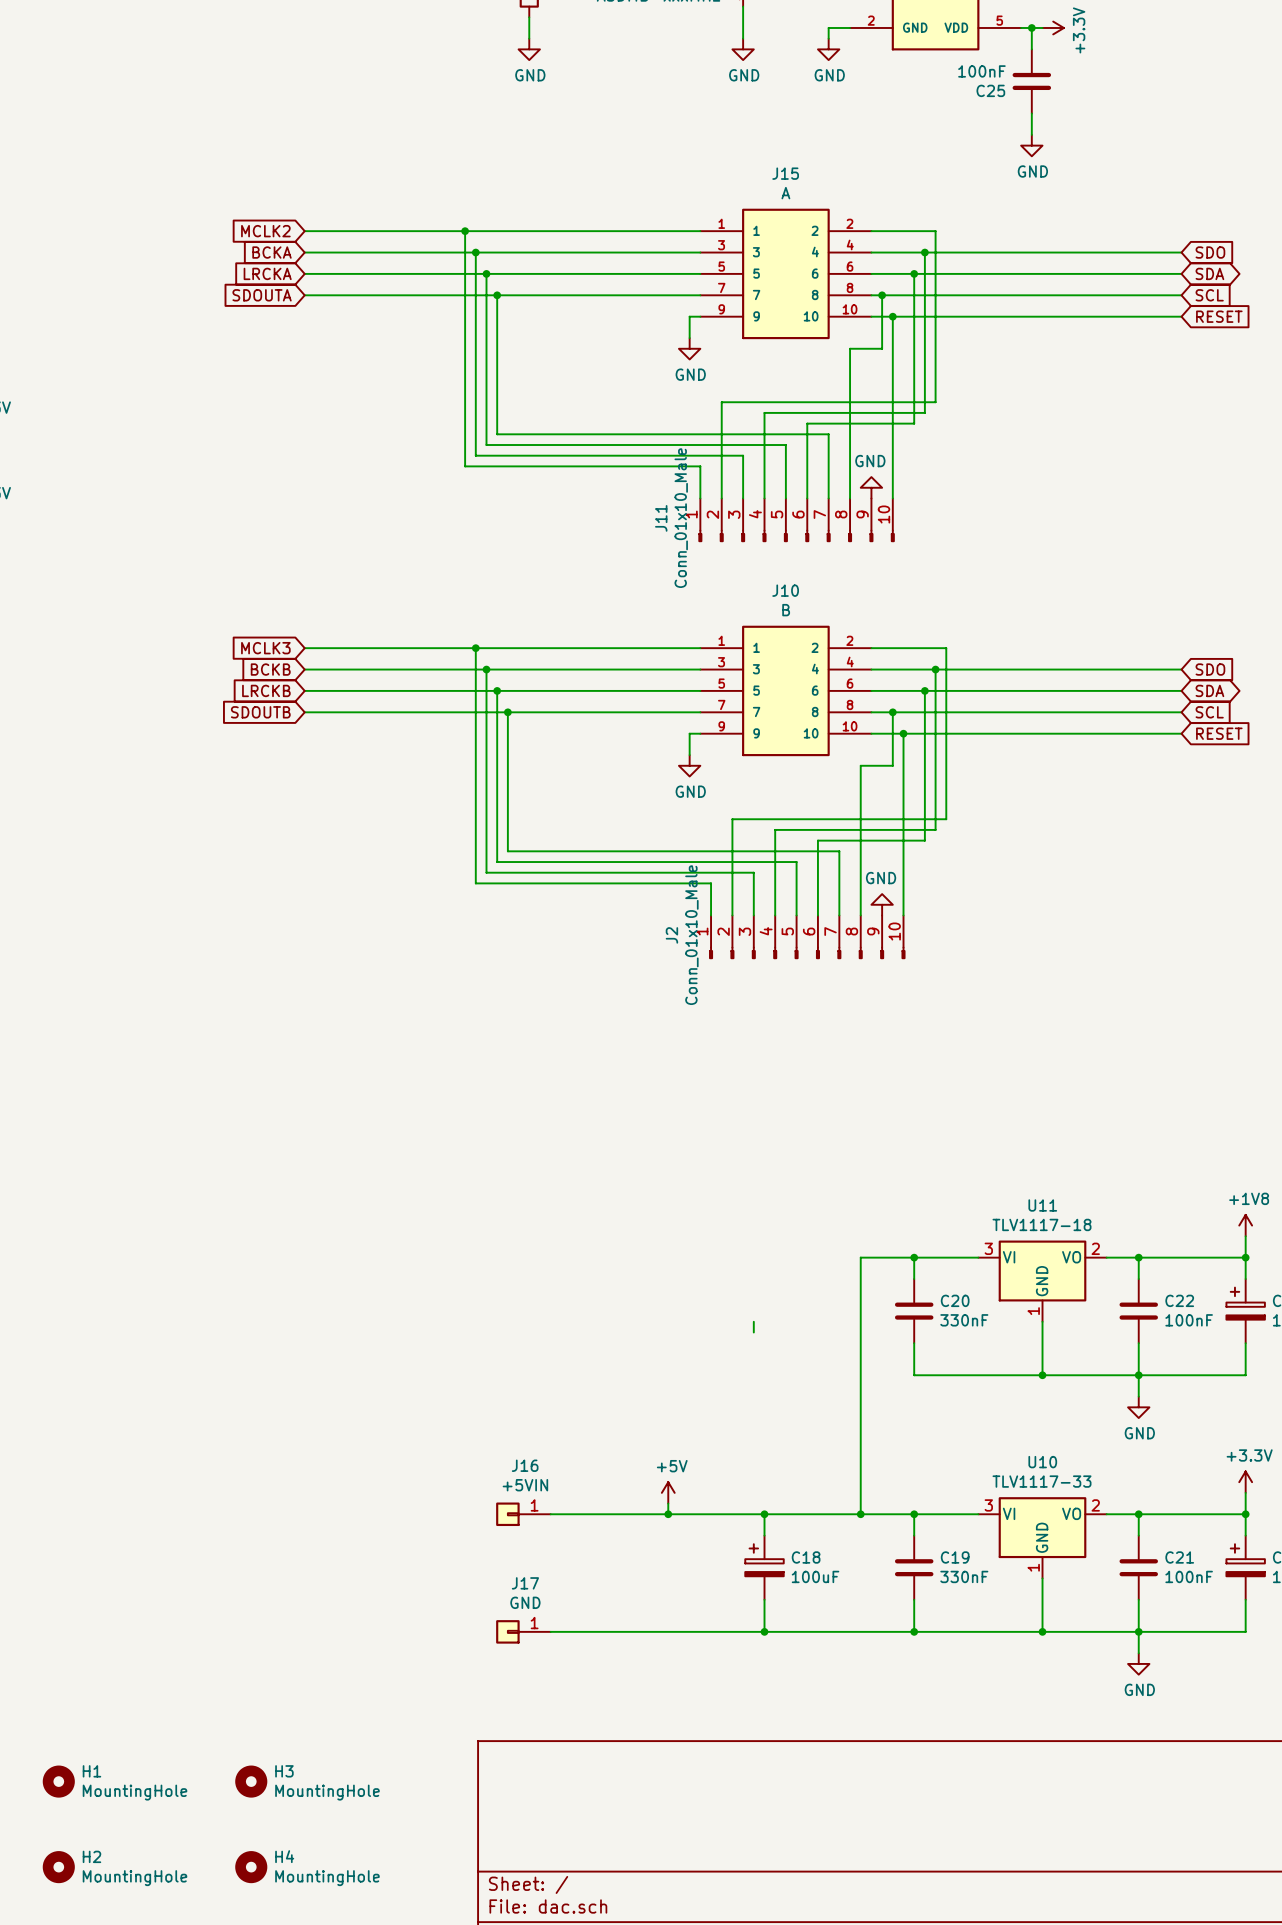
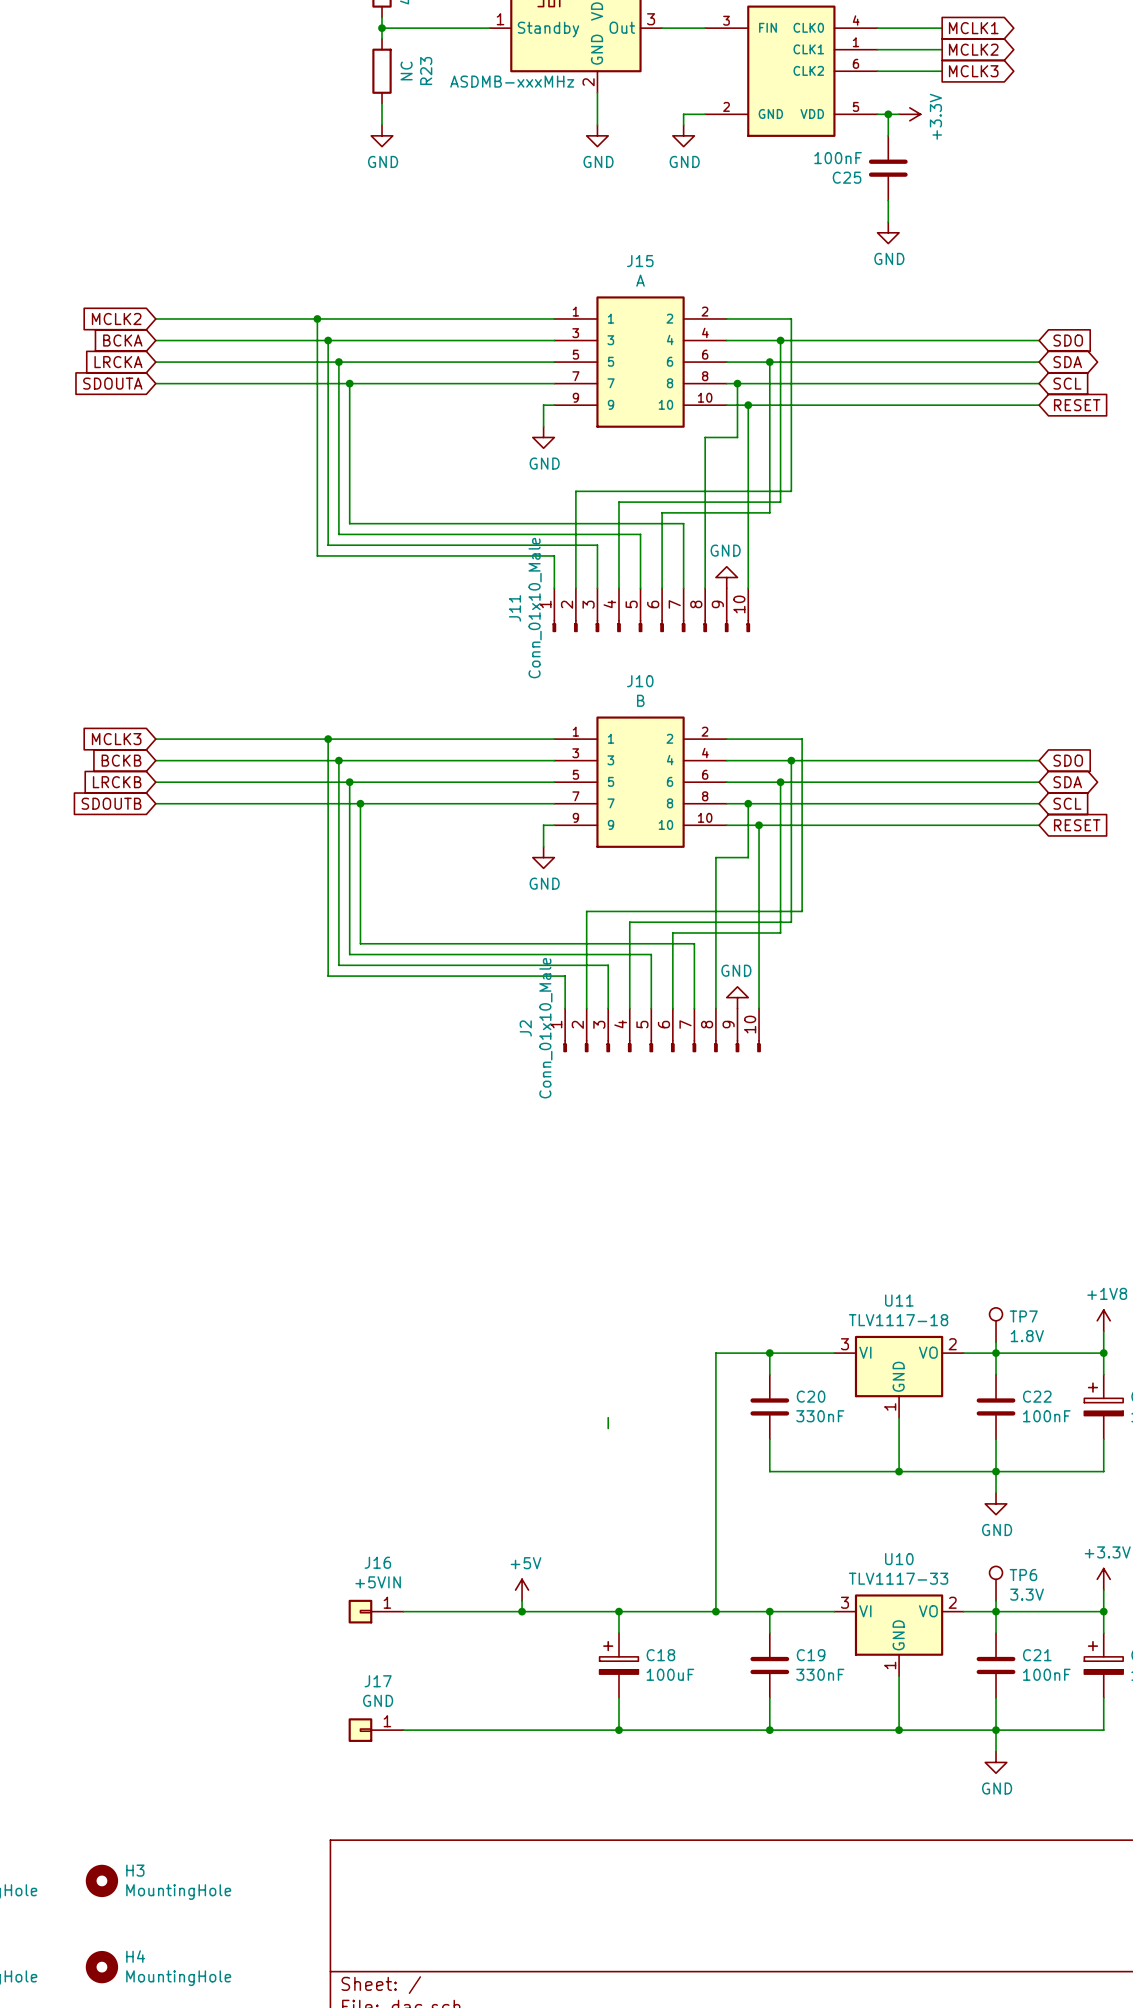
TP7: none -> 1.8V (996, 1325)
wire: none -> (996, 1342) (996, 1353)
TP6: none -> 3.3V (996, 1583)
wire: none -> (996, 1600) (996, 1611)

